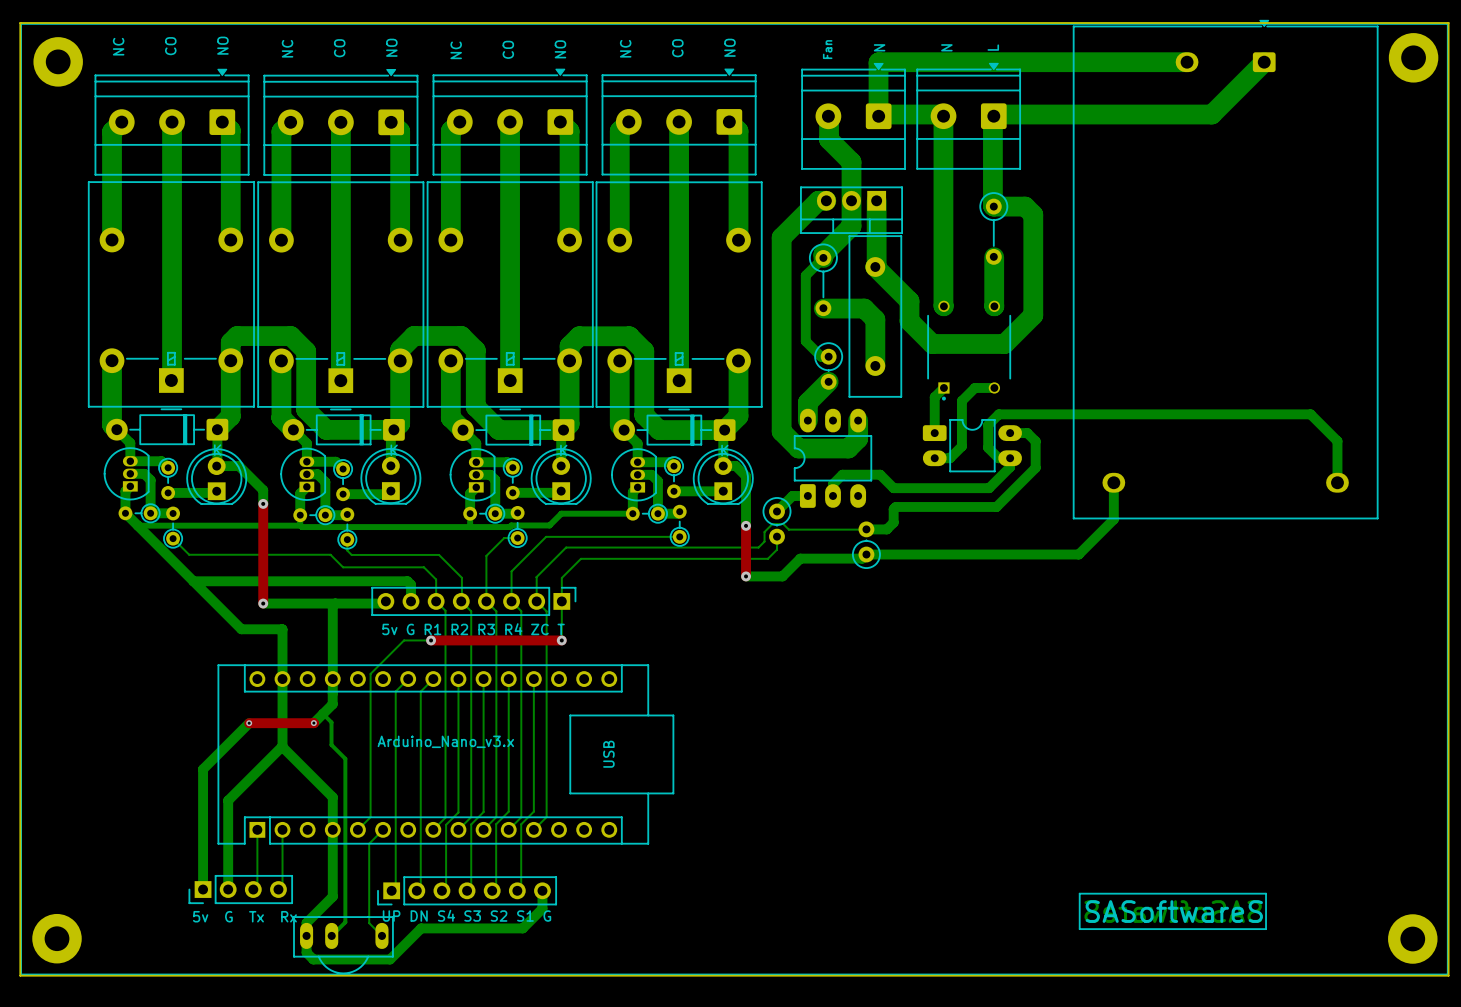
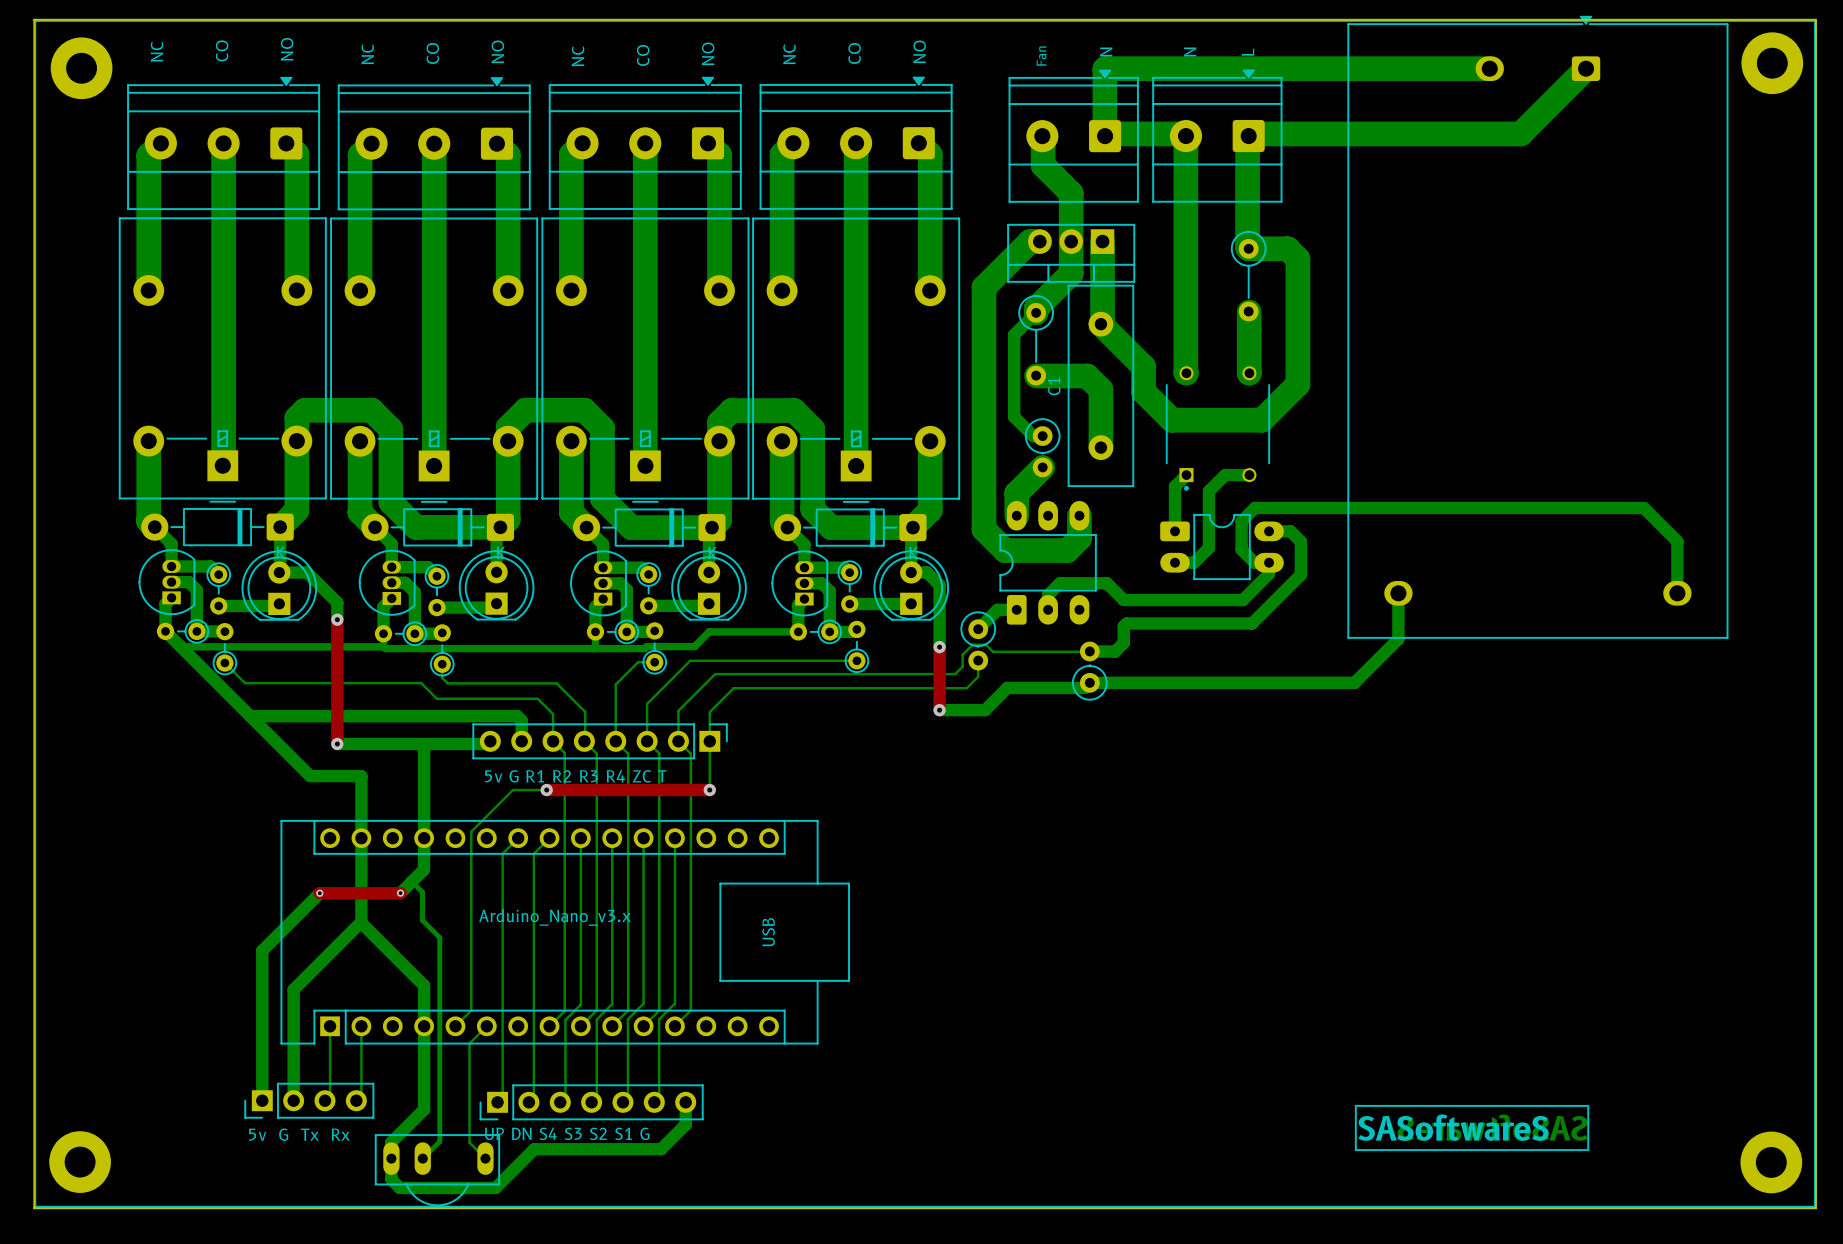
C1 name: none -> C1 (1054, 386)

